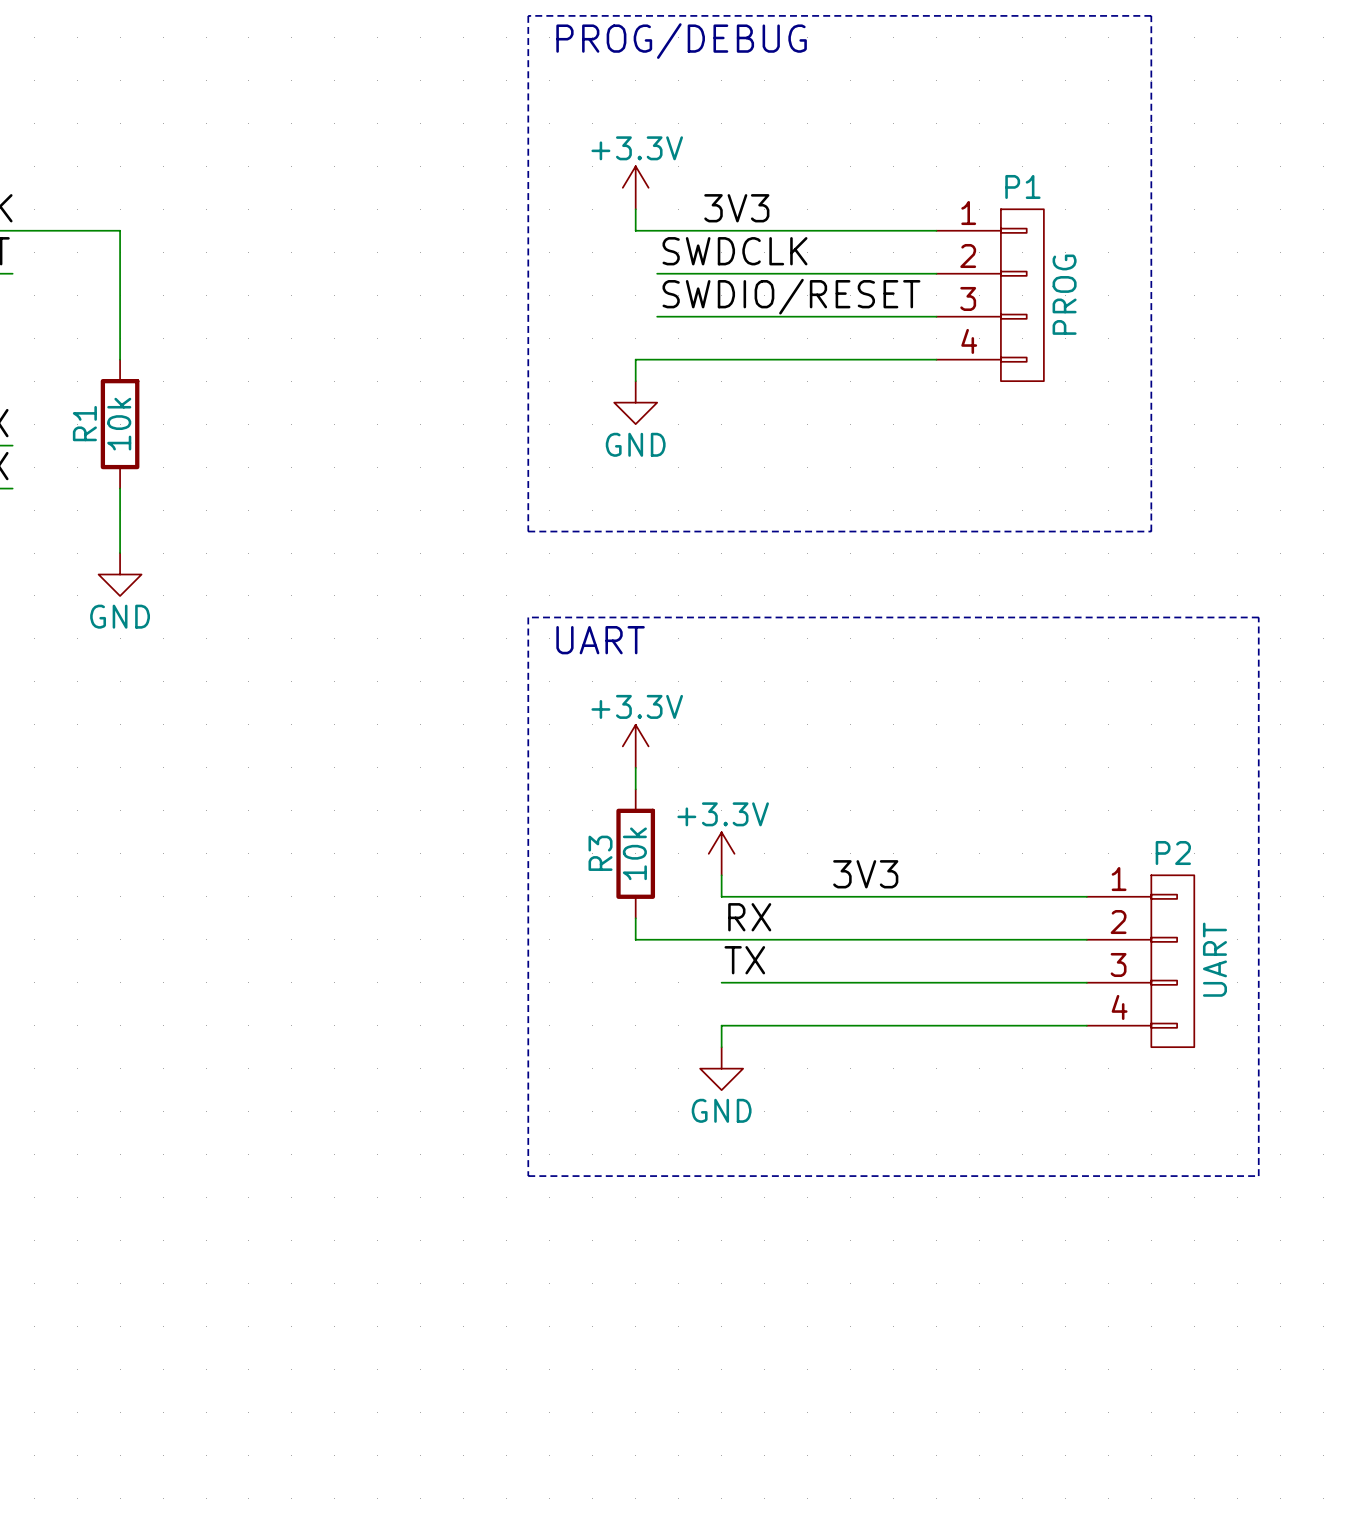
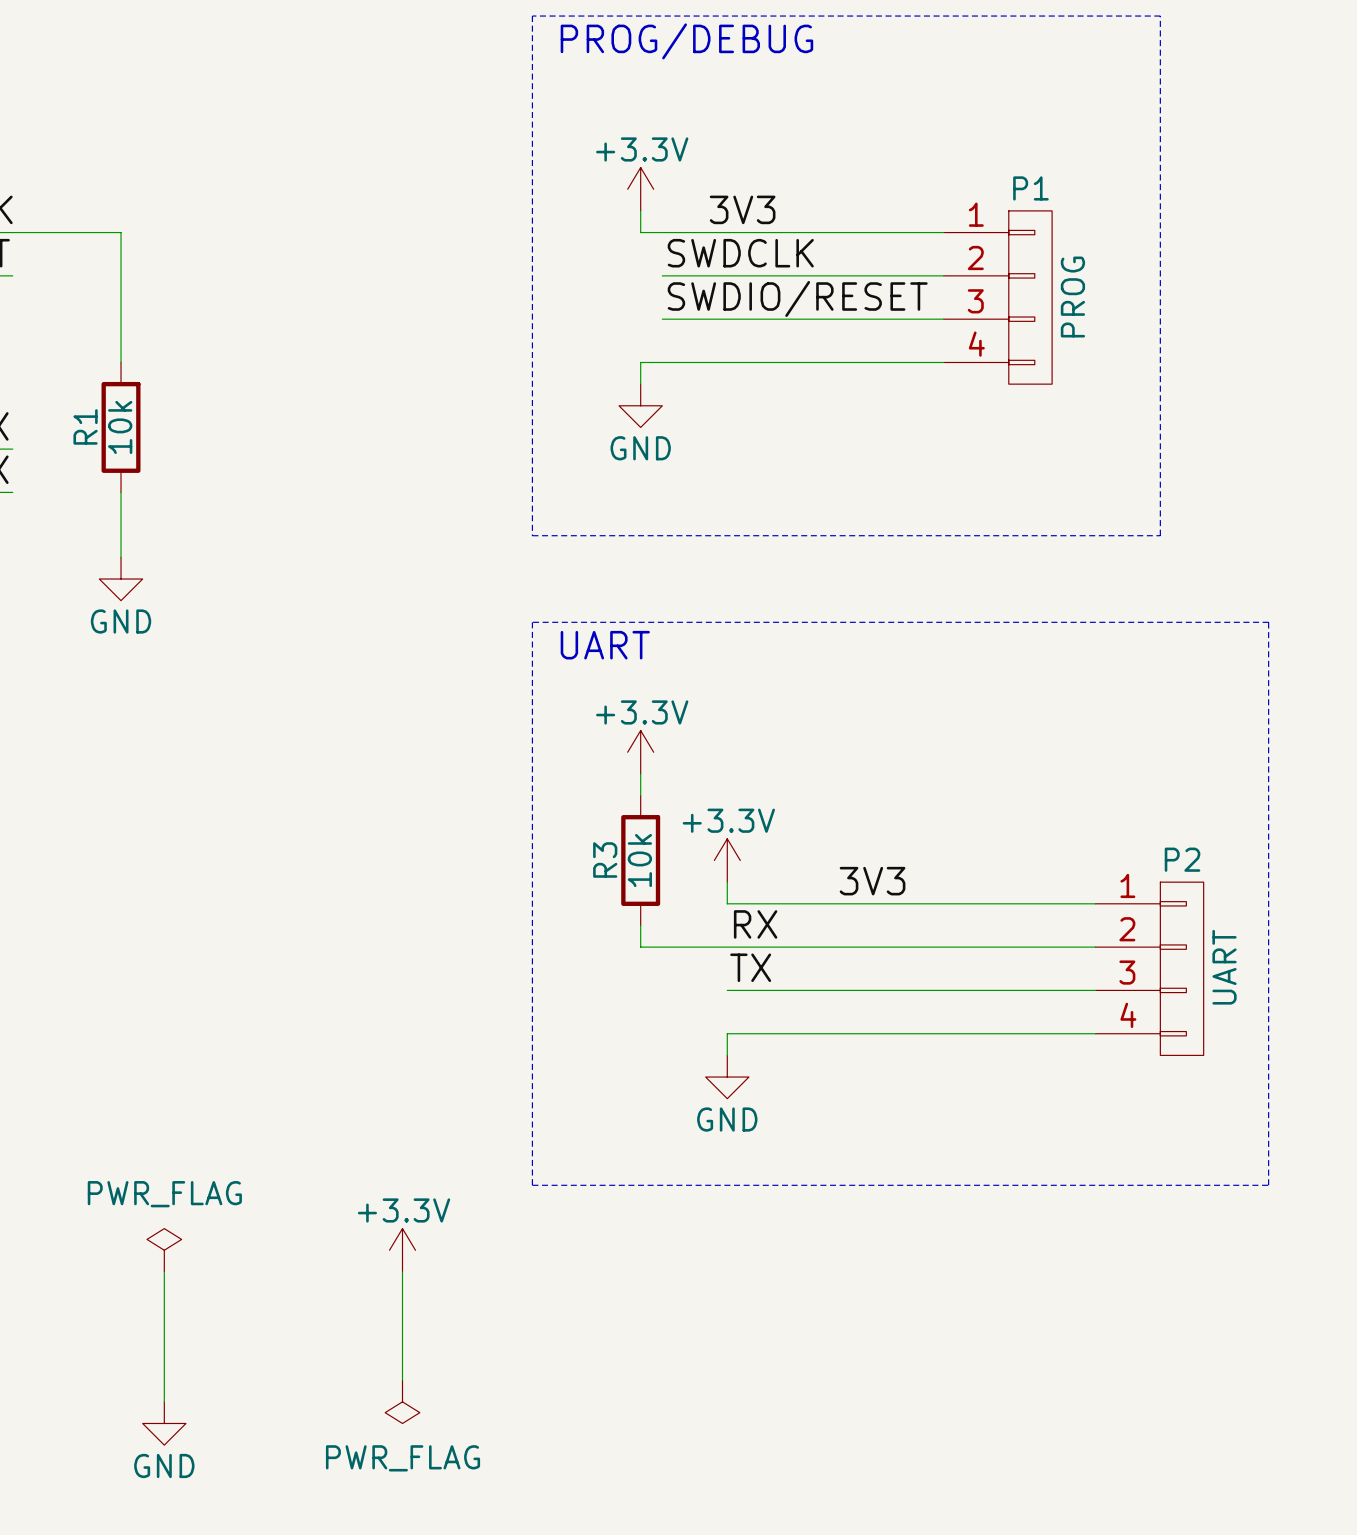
power symbol: none -> PWR_FLAG (164, 1250)
power symbol: none -> +3.3V (402, 1250)
wire: none -> (164, 1271) (164, 1401)
wire: none -> (402, 1271) (402, 1380)
power symbol: none -> PWR_FLAG (402, 1401)
power symbol: none -> GND (164, 1423)

